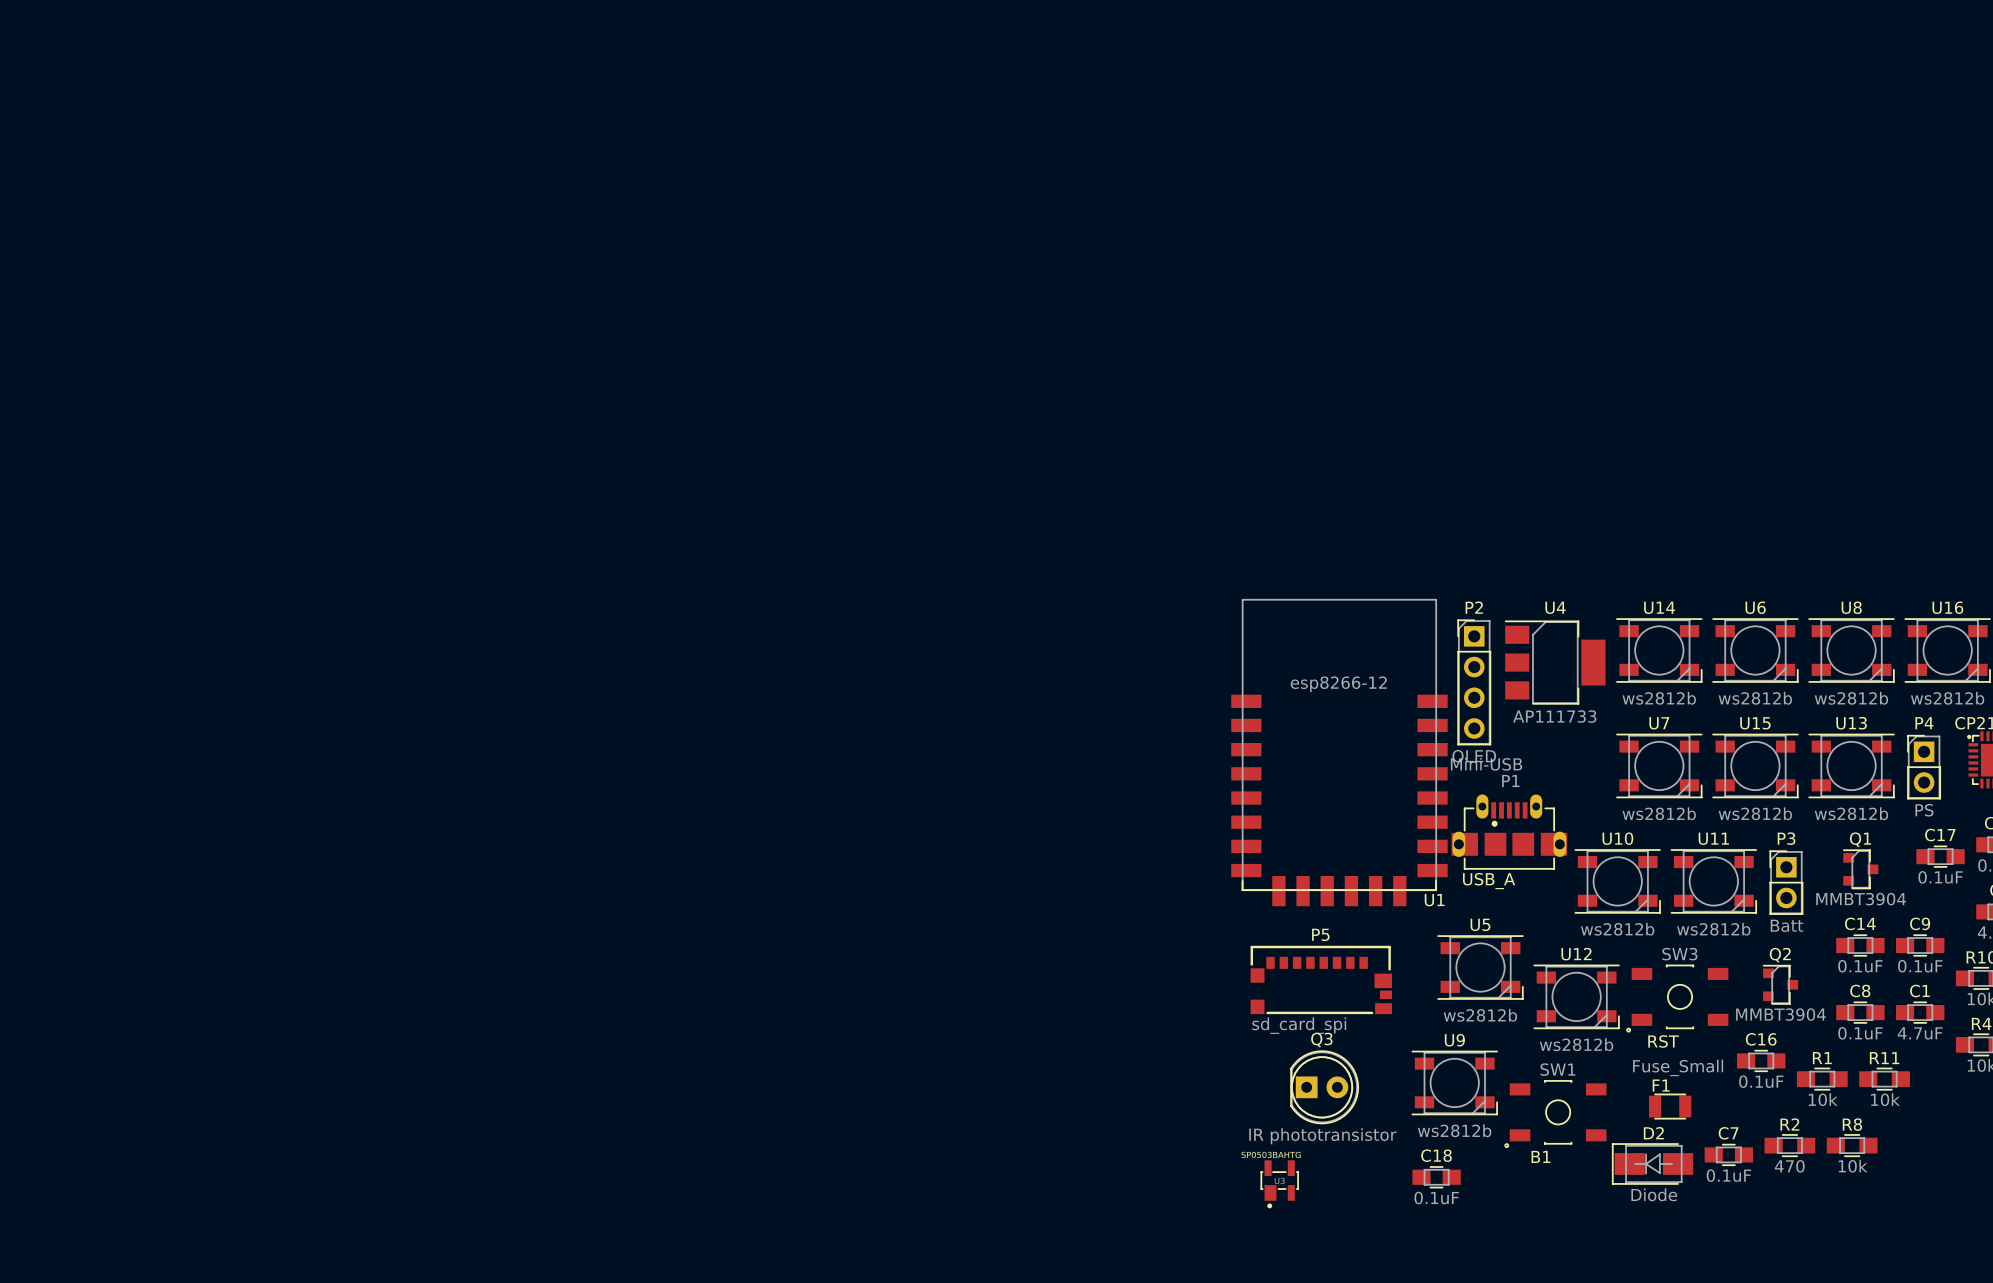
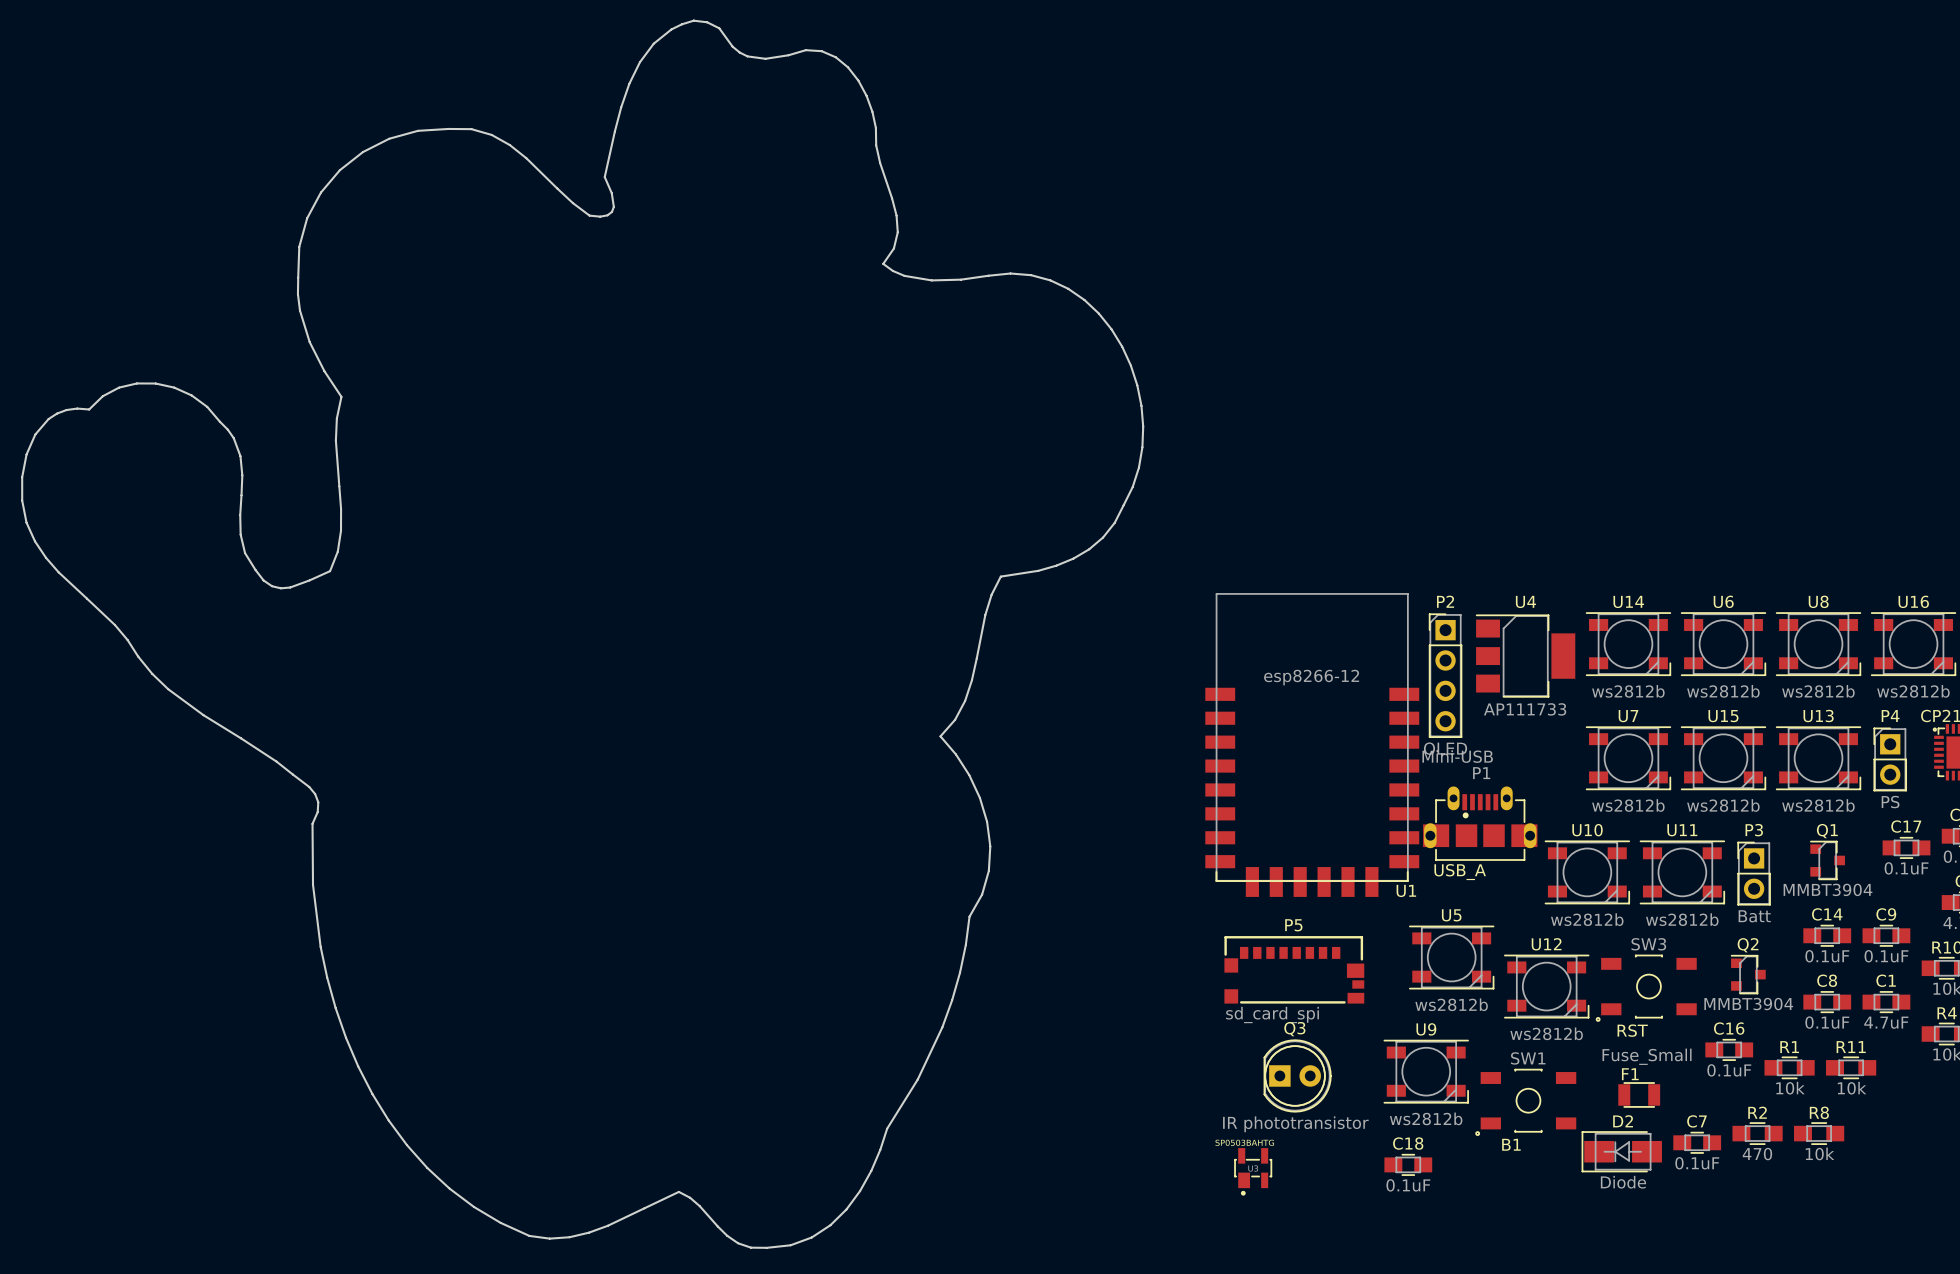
drawing: none -> [21, 19, 1145, 1249]

